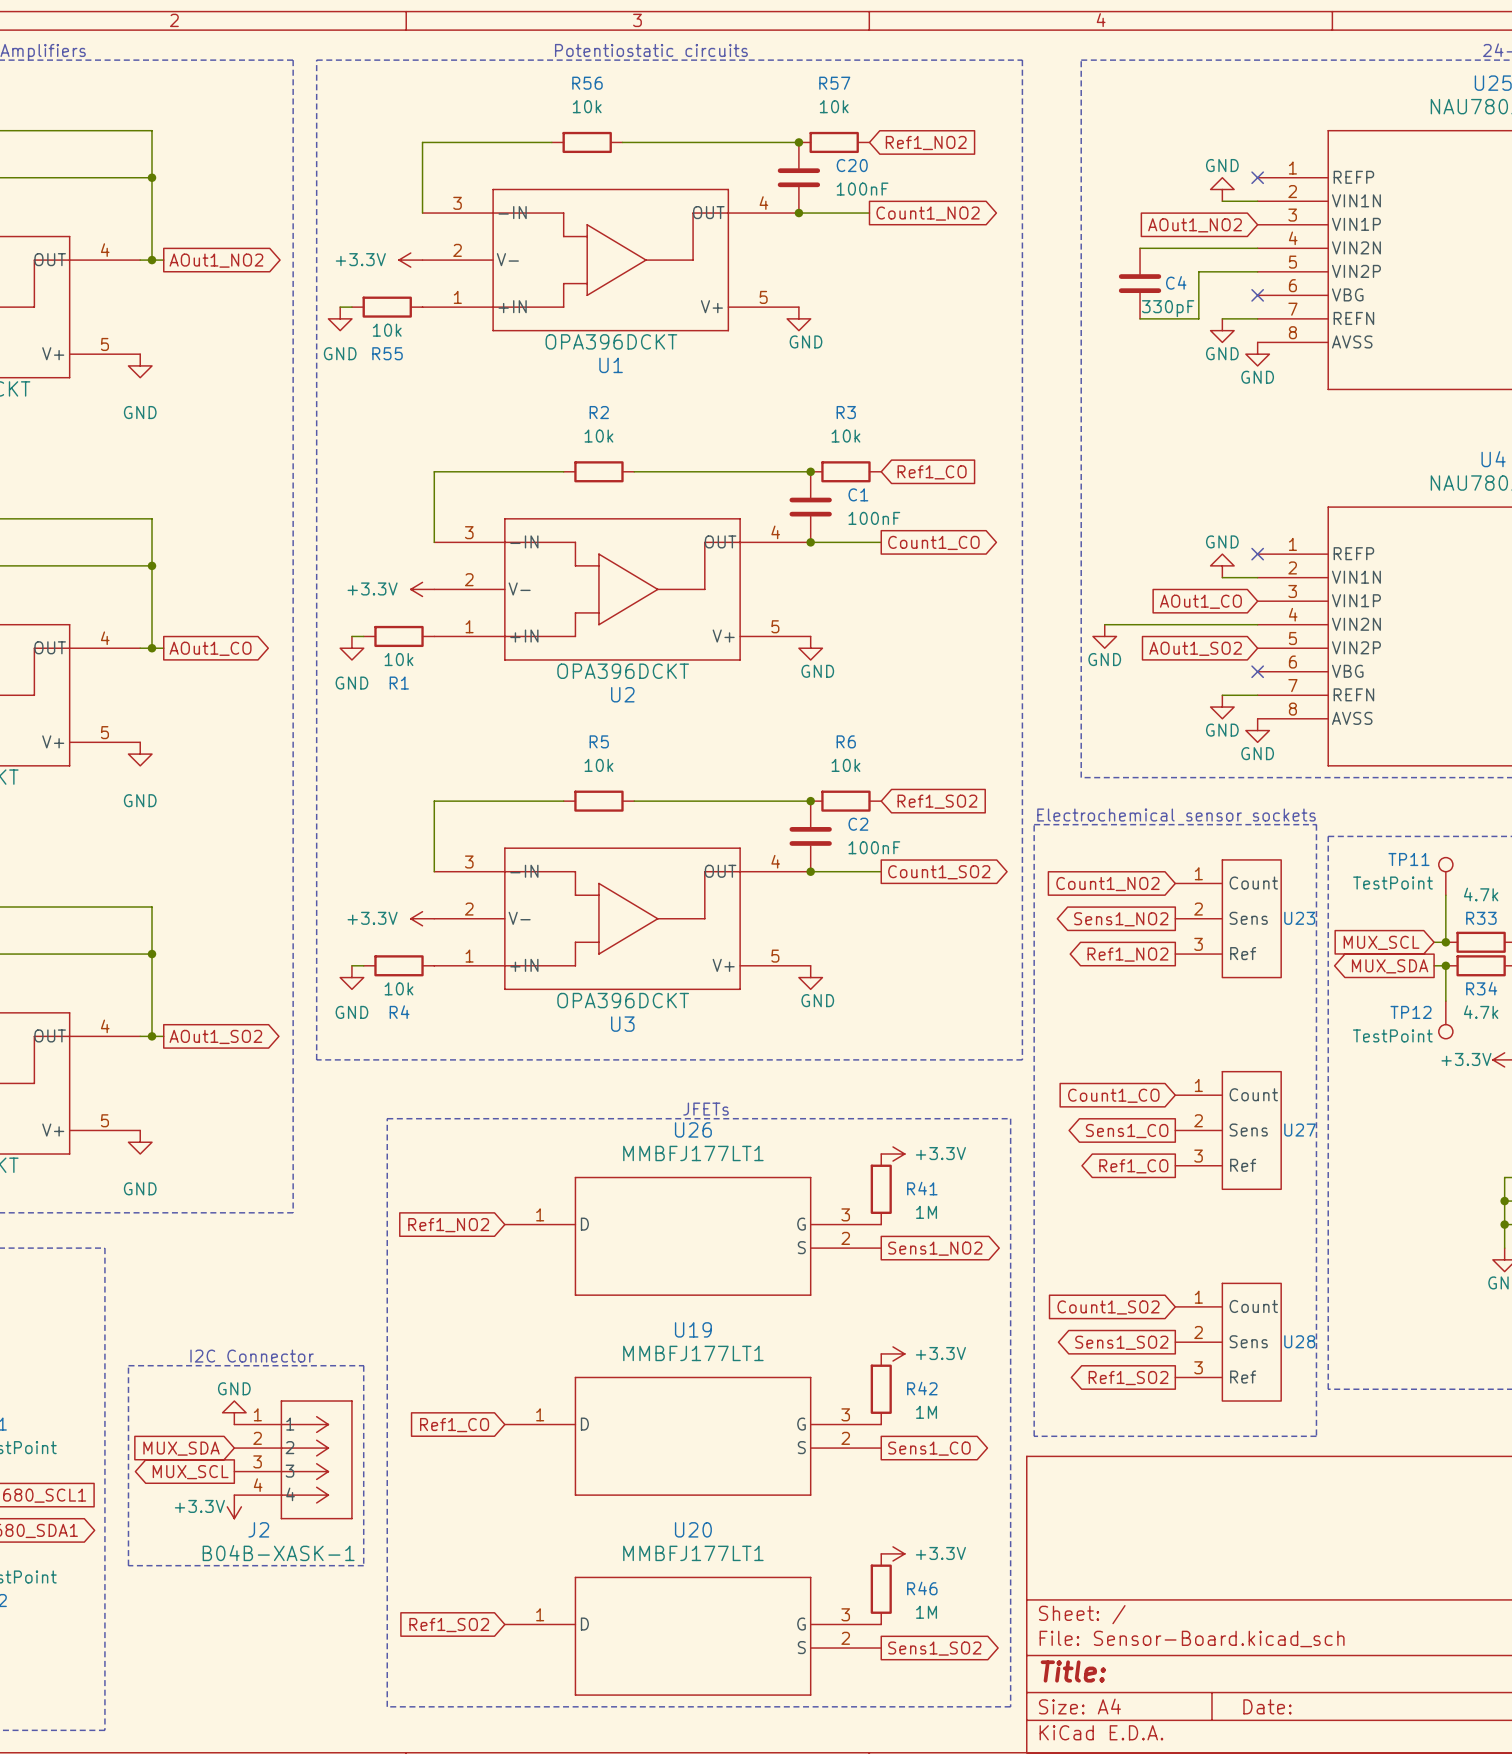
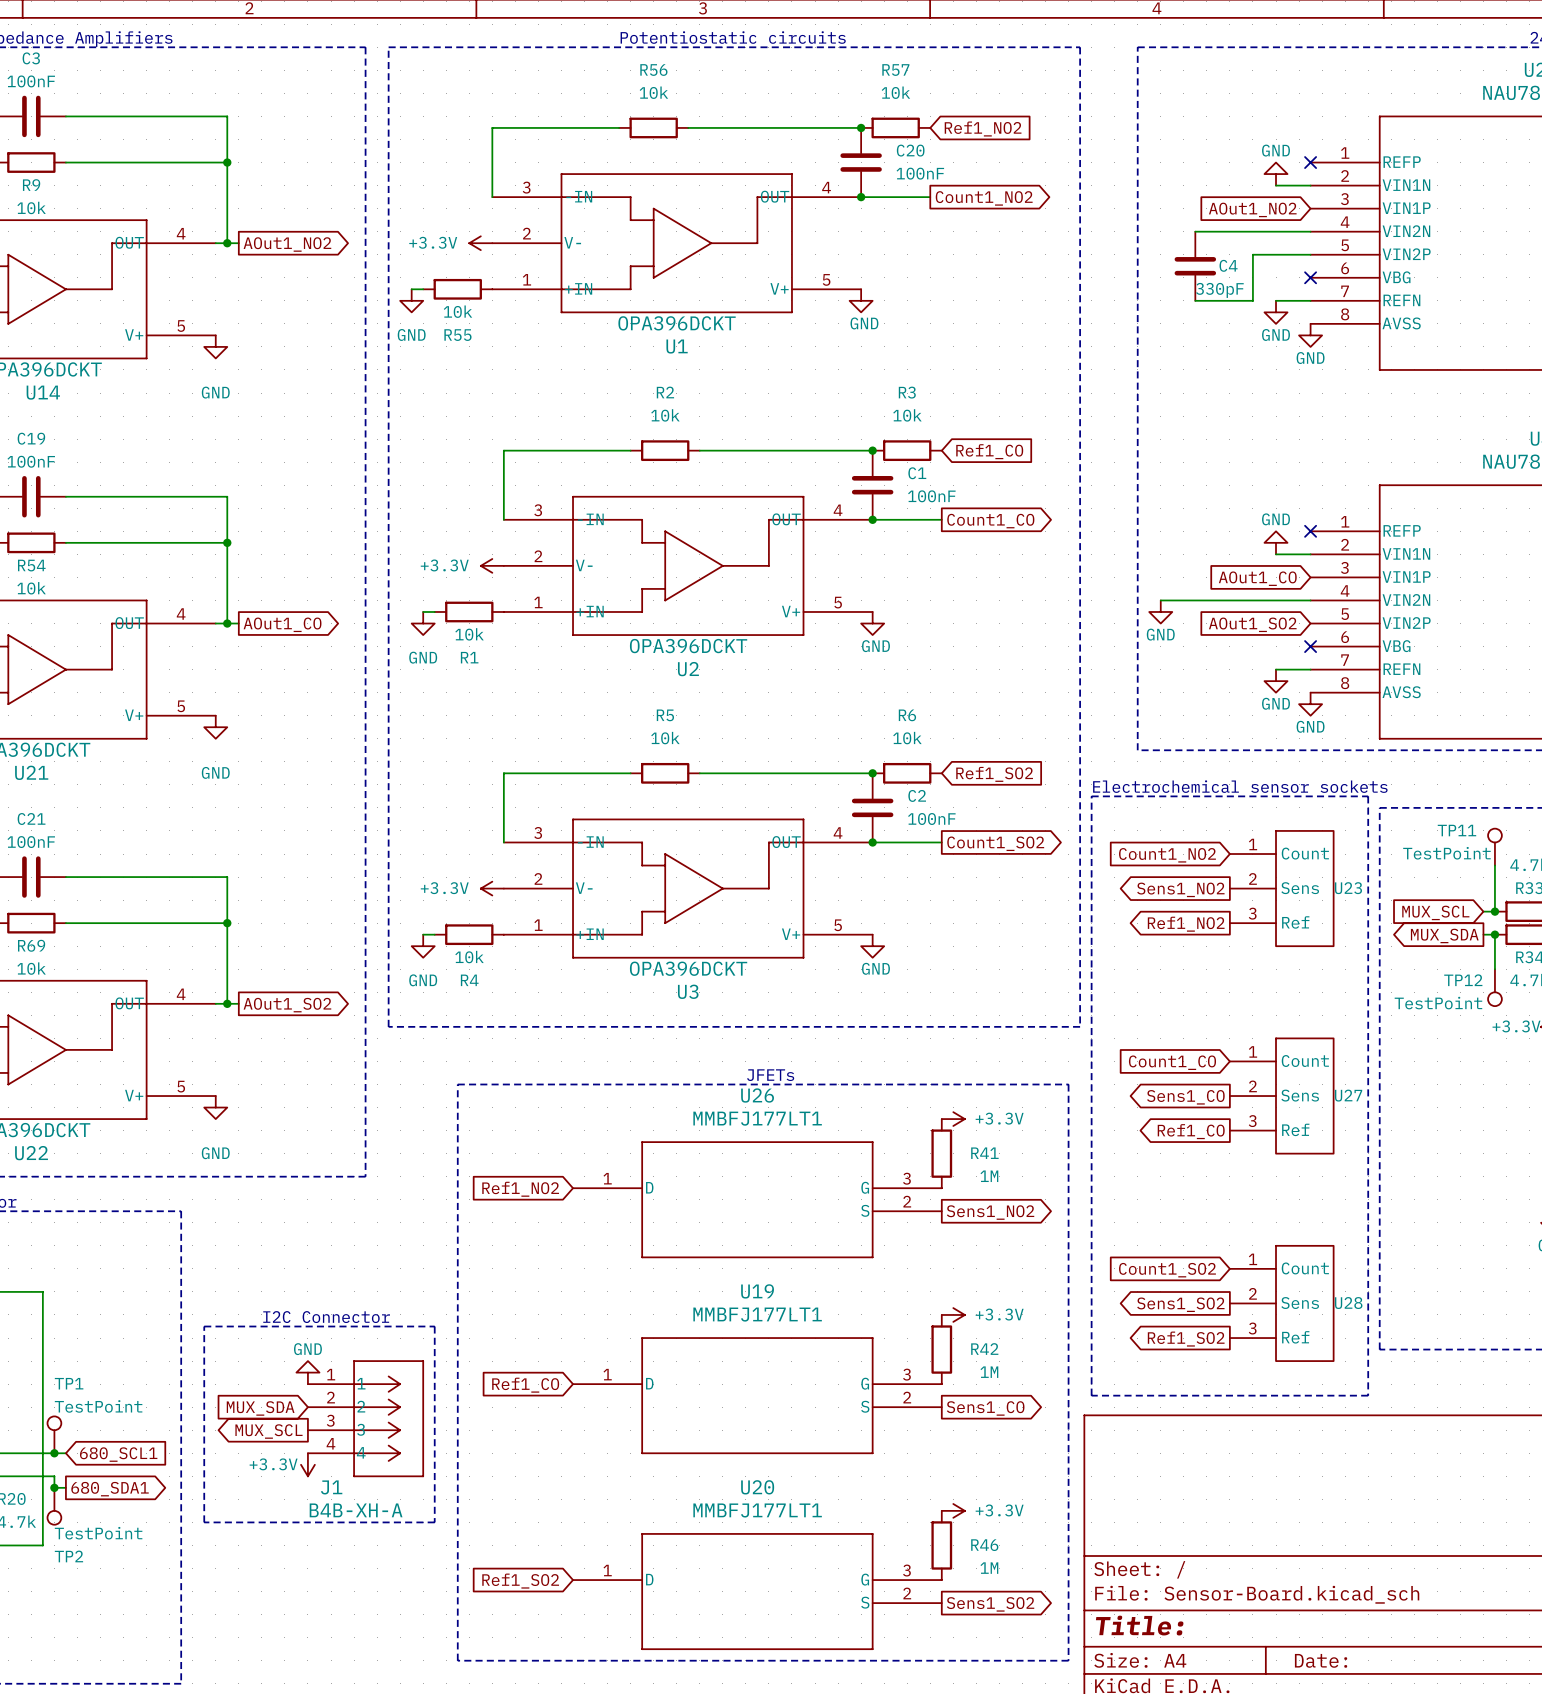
J2 name: J2 (258, 1529) -> J1 (331, 1487)
J2 value: B04B-XASK-1 (278, 1553) -> B4B-XH-A (356, 1510)

